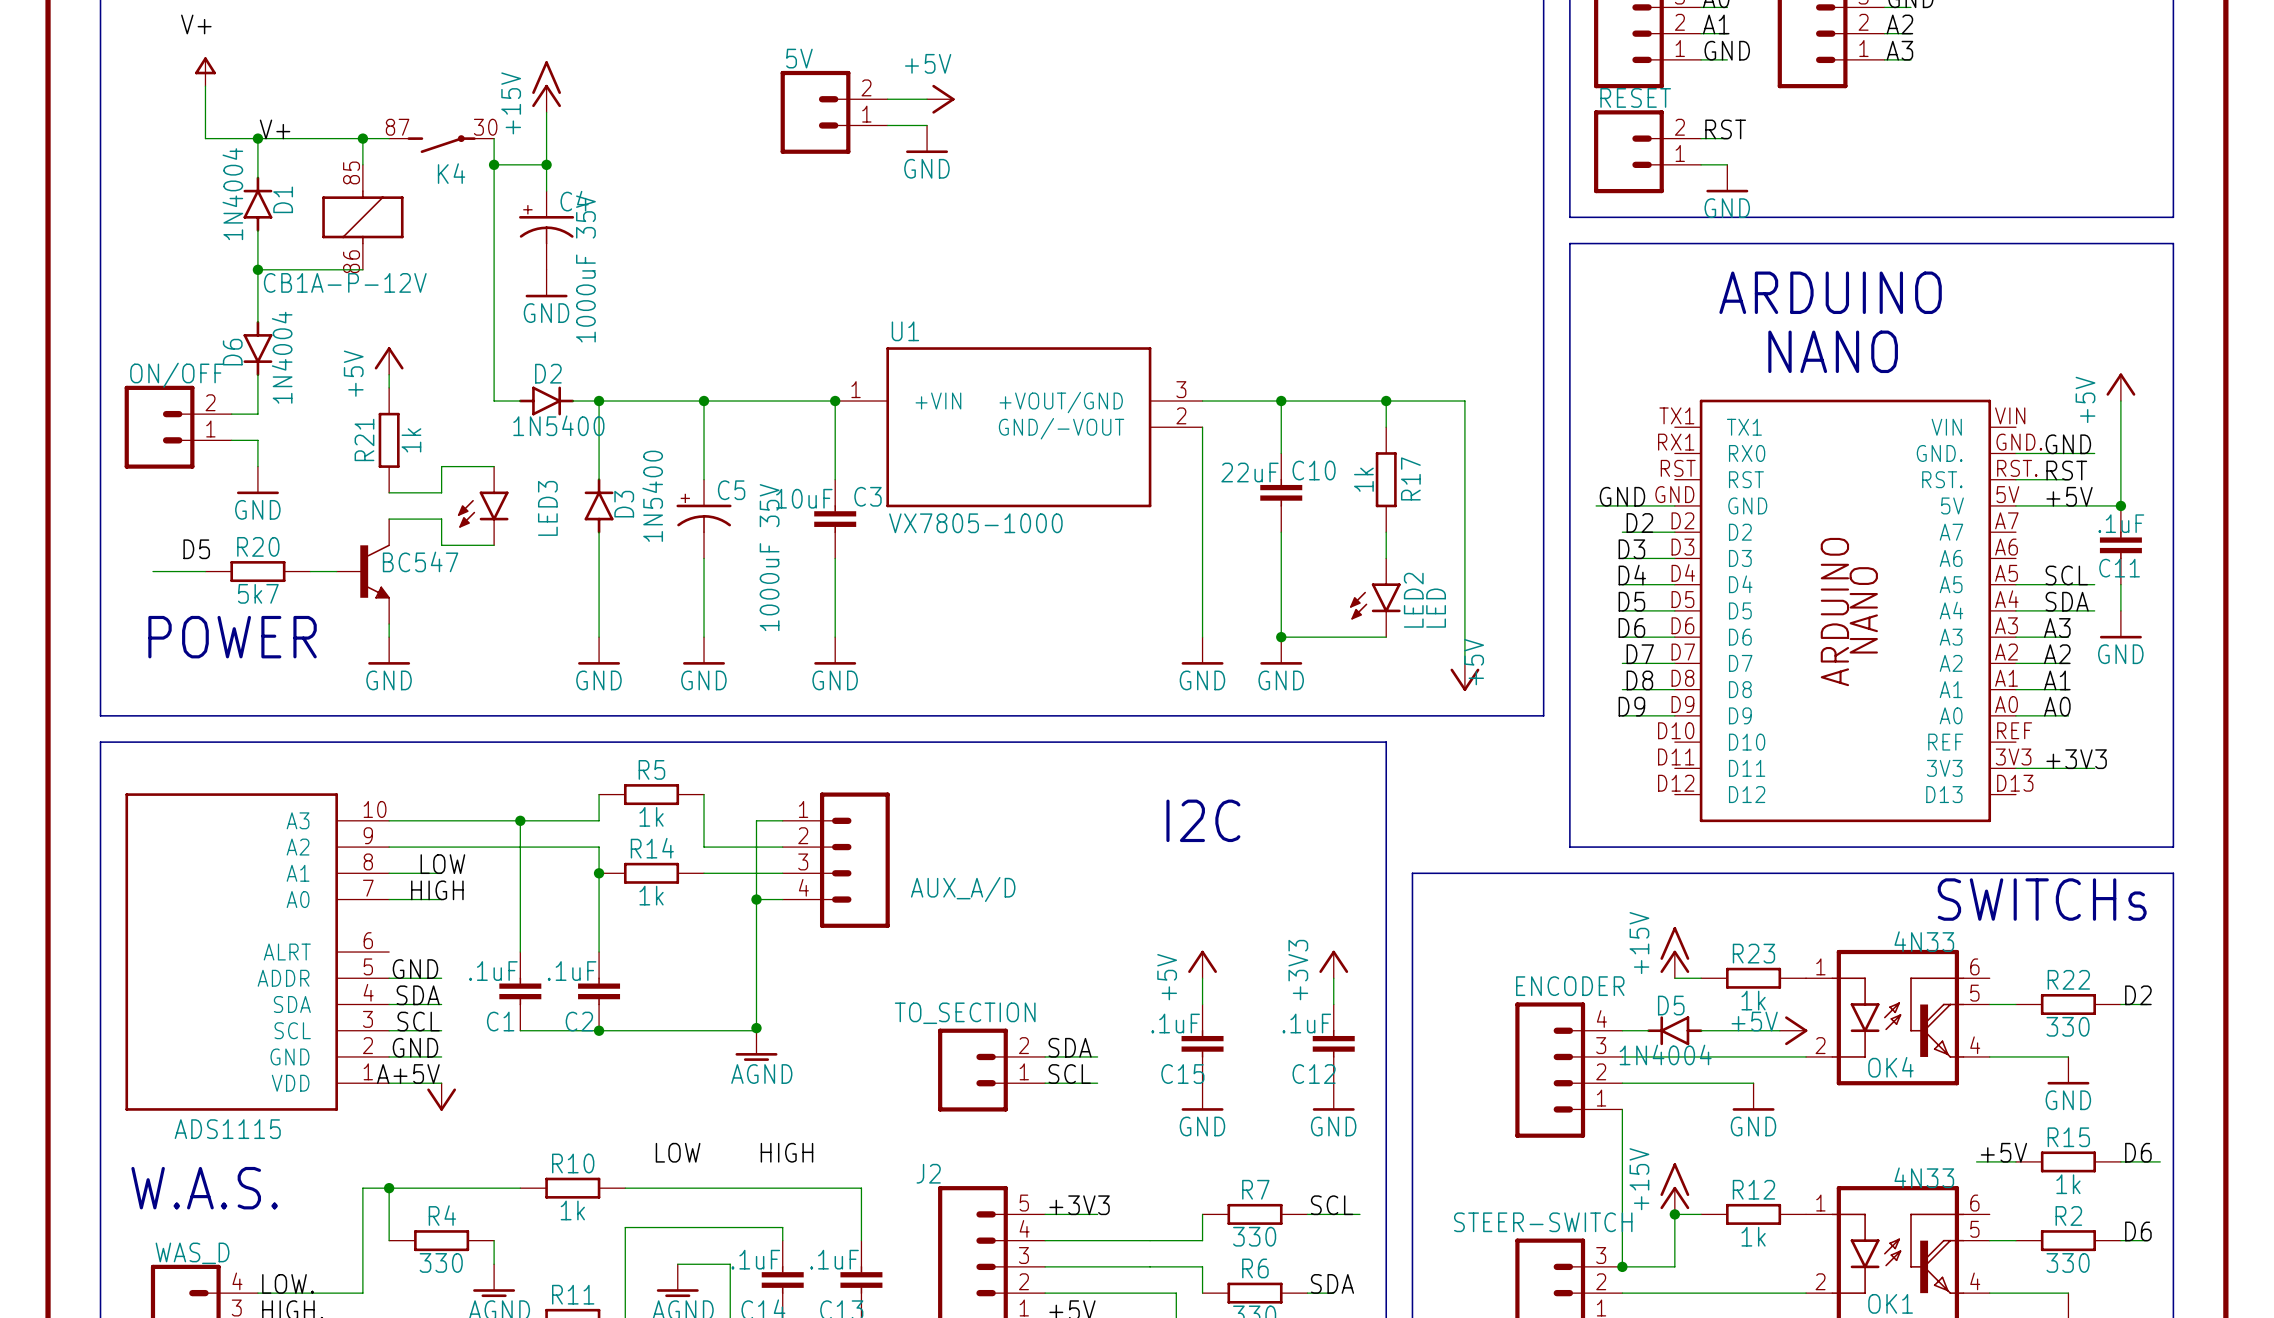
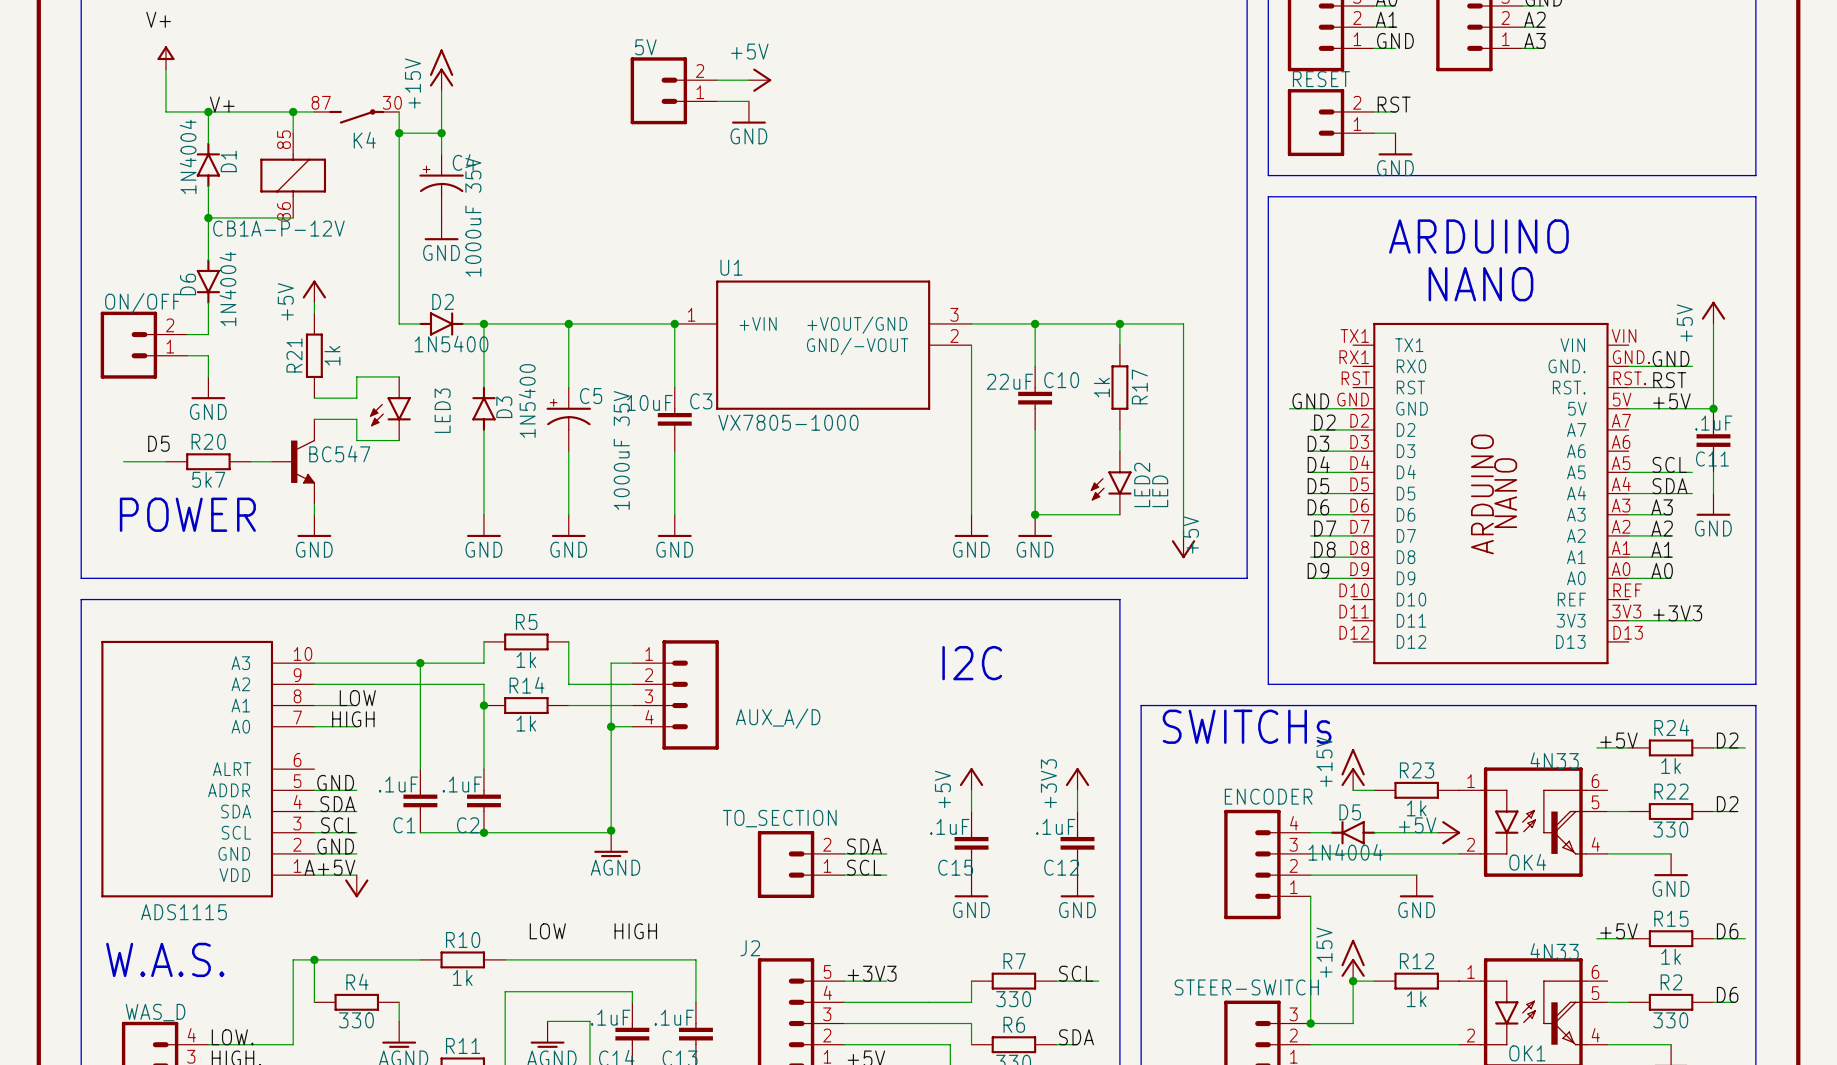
text: none -> SWITCHs (1247, 726)
text: SWITCHs (2042, 899) -> none
label: none -> +5V (1618, 740)
label: none -> D2 (1727, 740)
wire: none -> (1596, 747) (1628, 747)
R24: none -> 1k (1671, 747)
wire: none -> (1713, 747) (1745, 747)

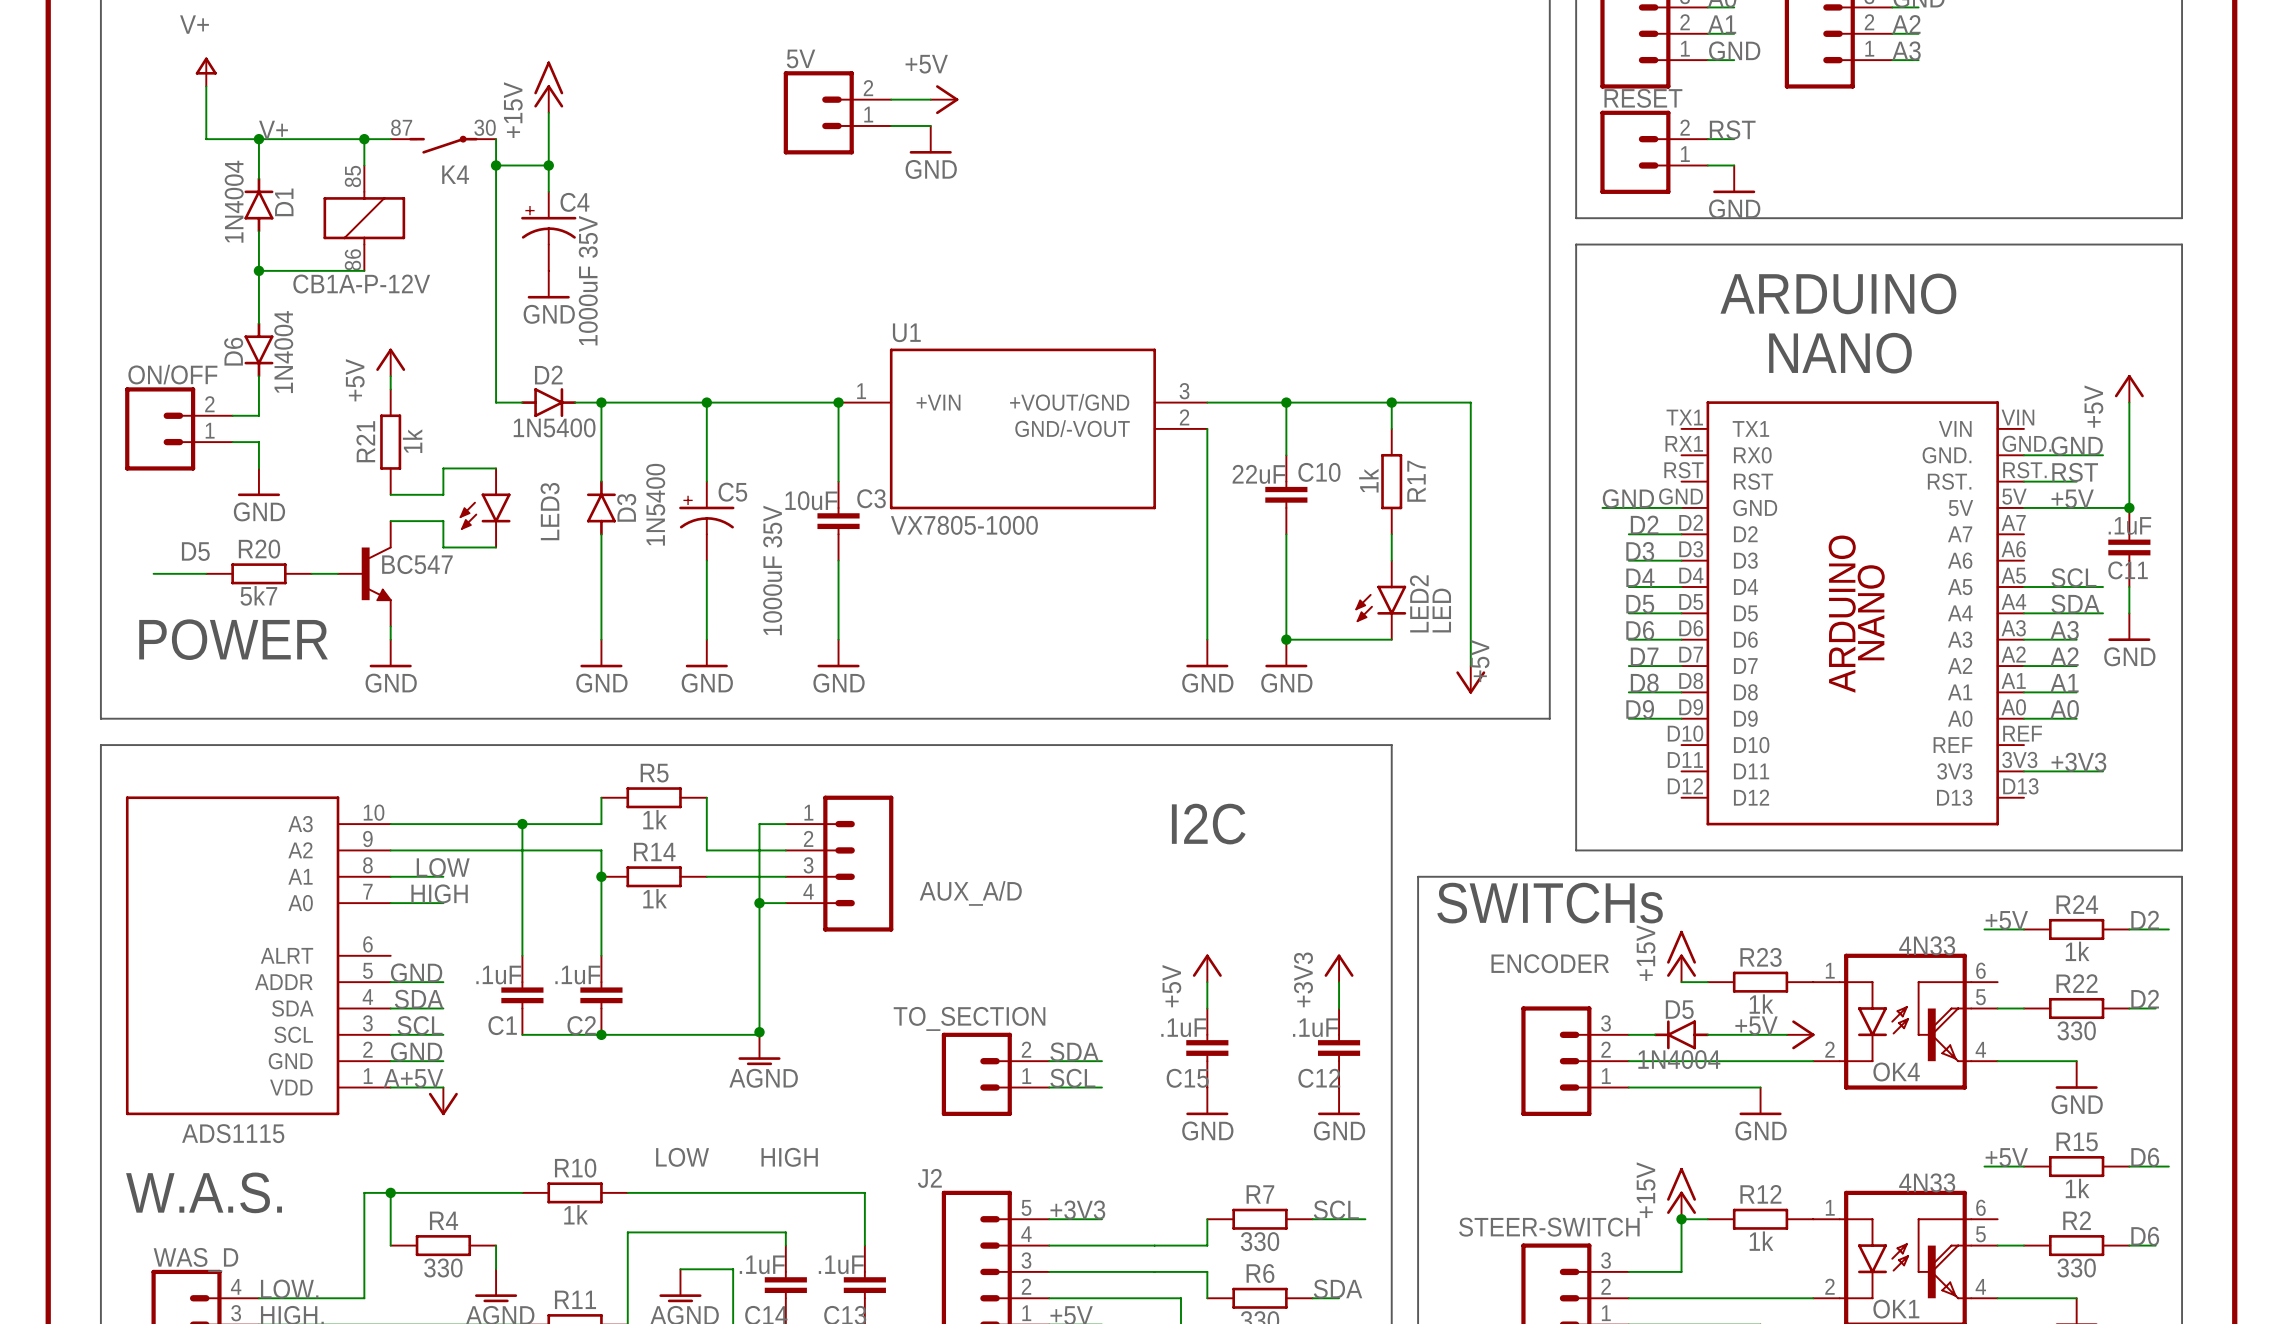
ENCODER: none -> (1575, 1061)
ENCODER: (1267, 864) -> none
wire: (1310, 896) (1310, 1023) -> none
junction: (1310, 1023) -> none

